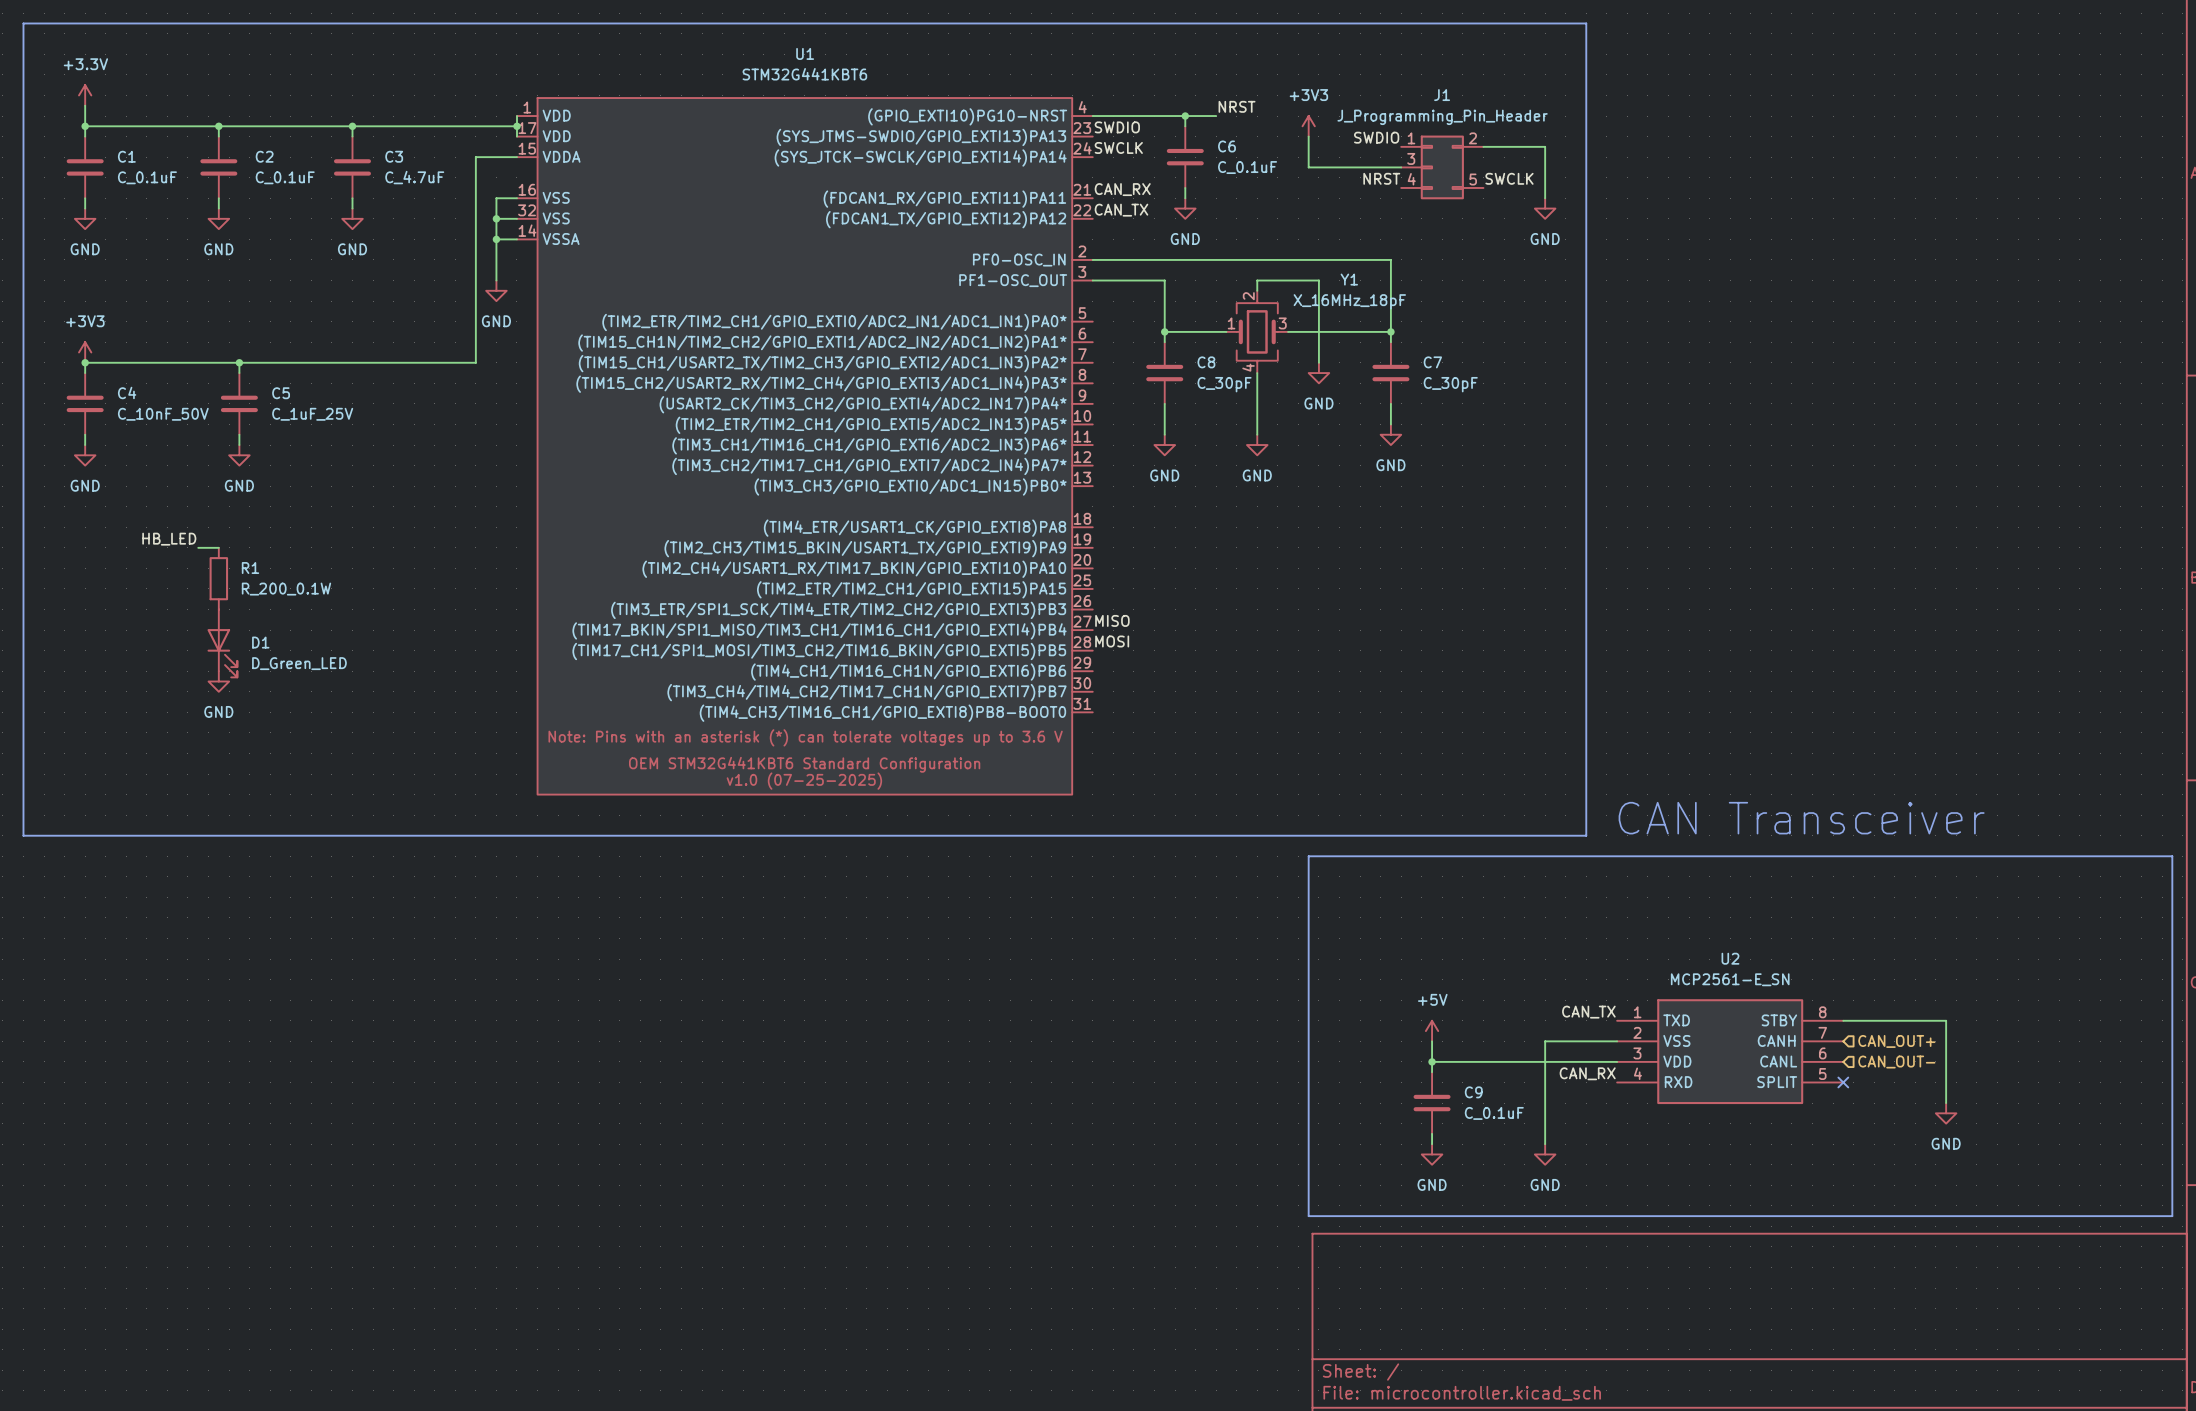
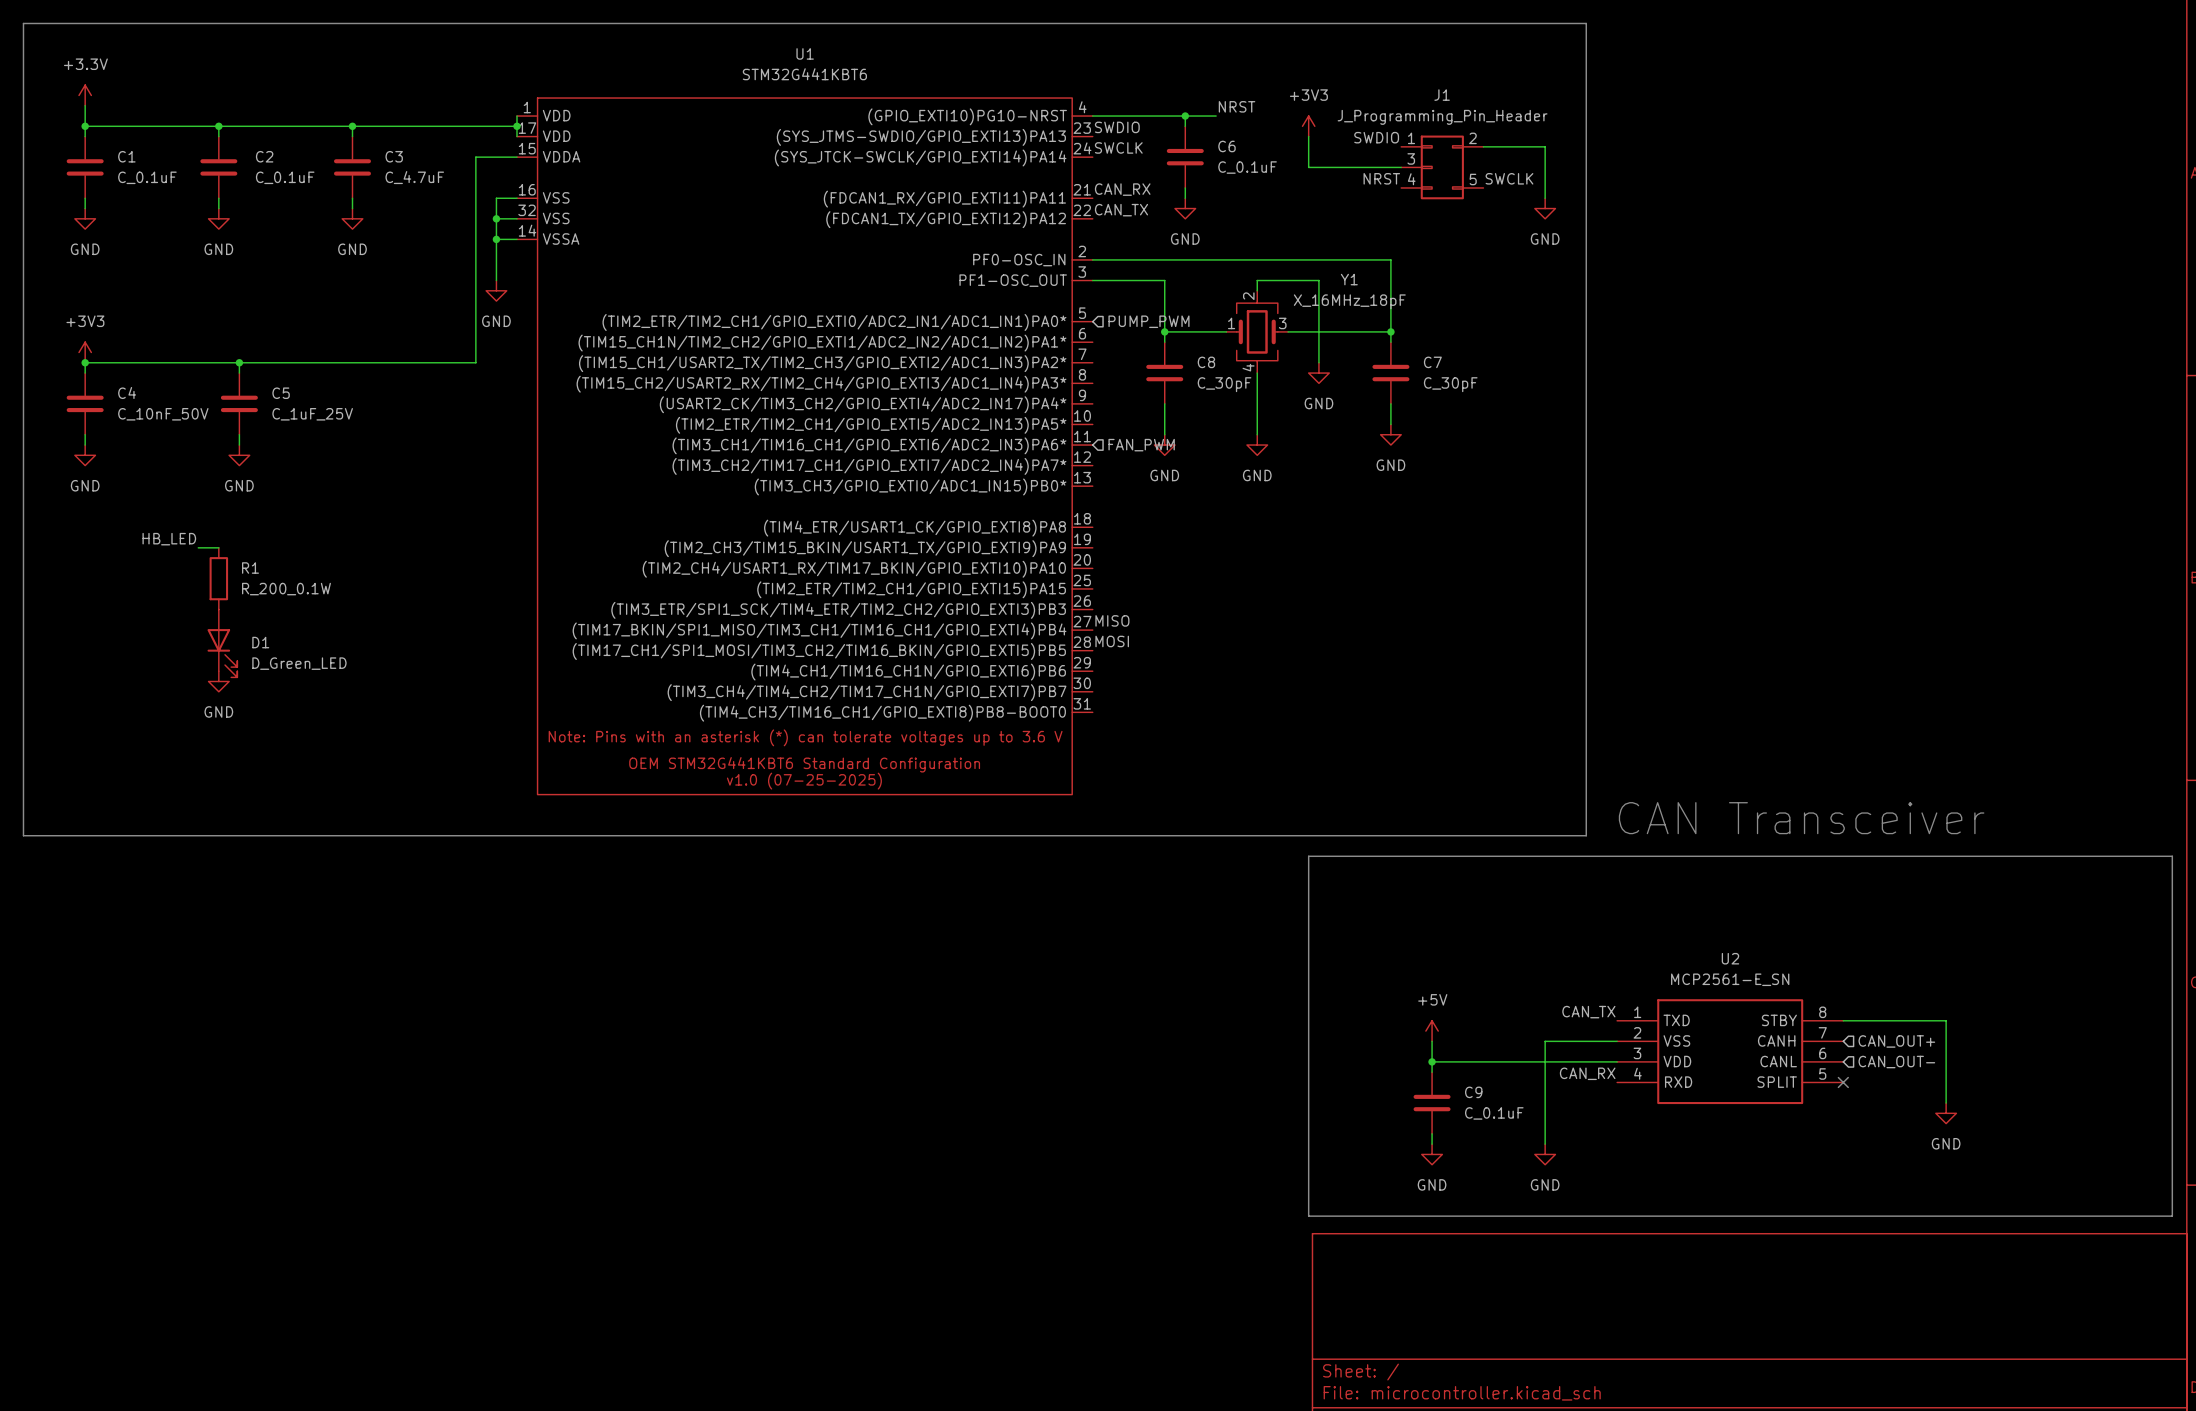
hierarchical label: none -> PUMP_PWM (1148, 321)
hierarchical label: none -> FAN_PWM (1141, 445)

